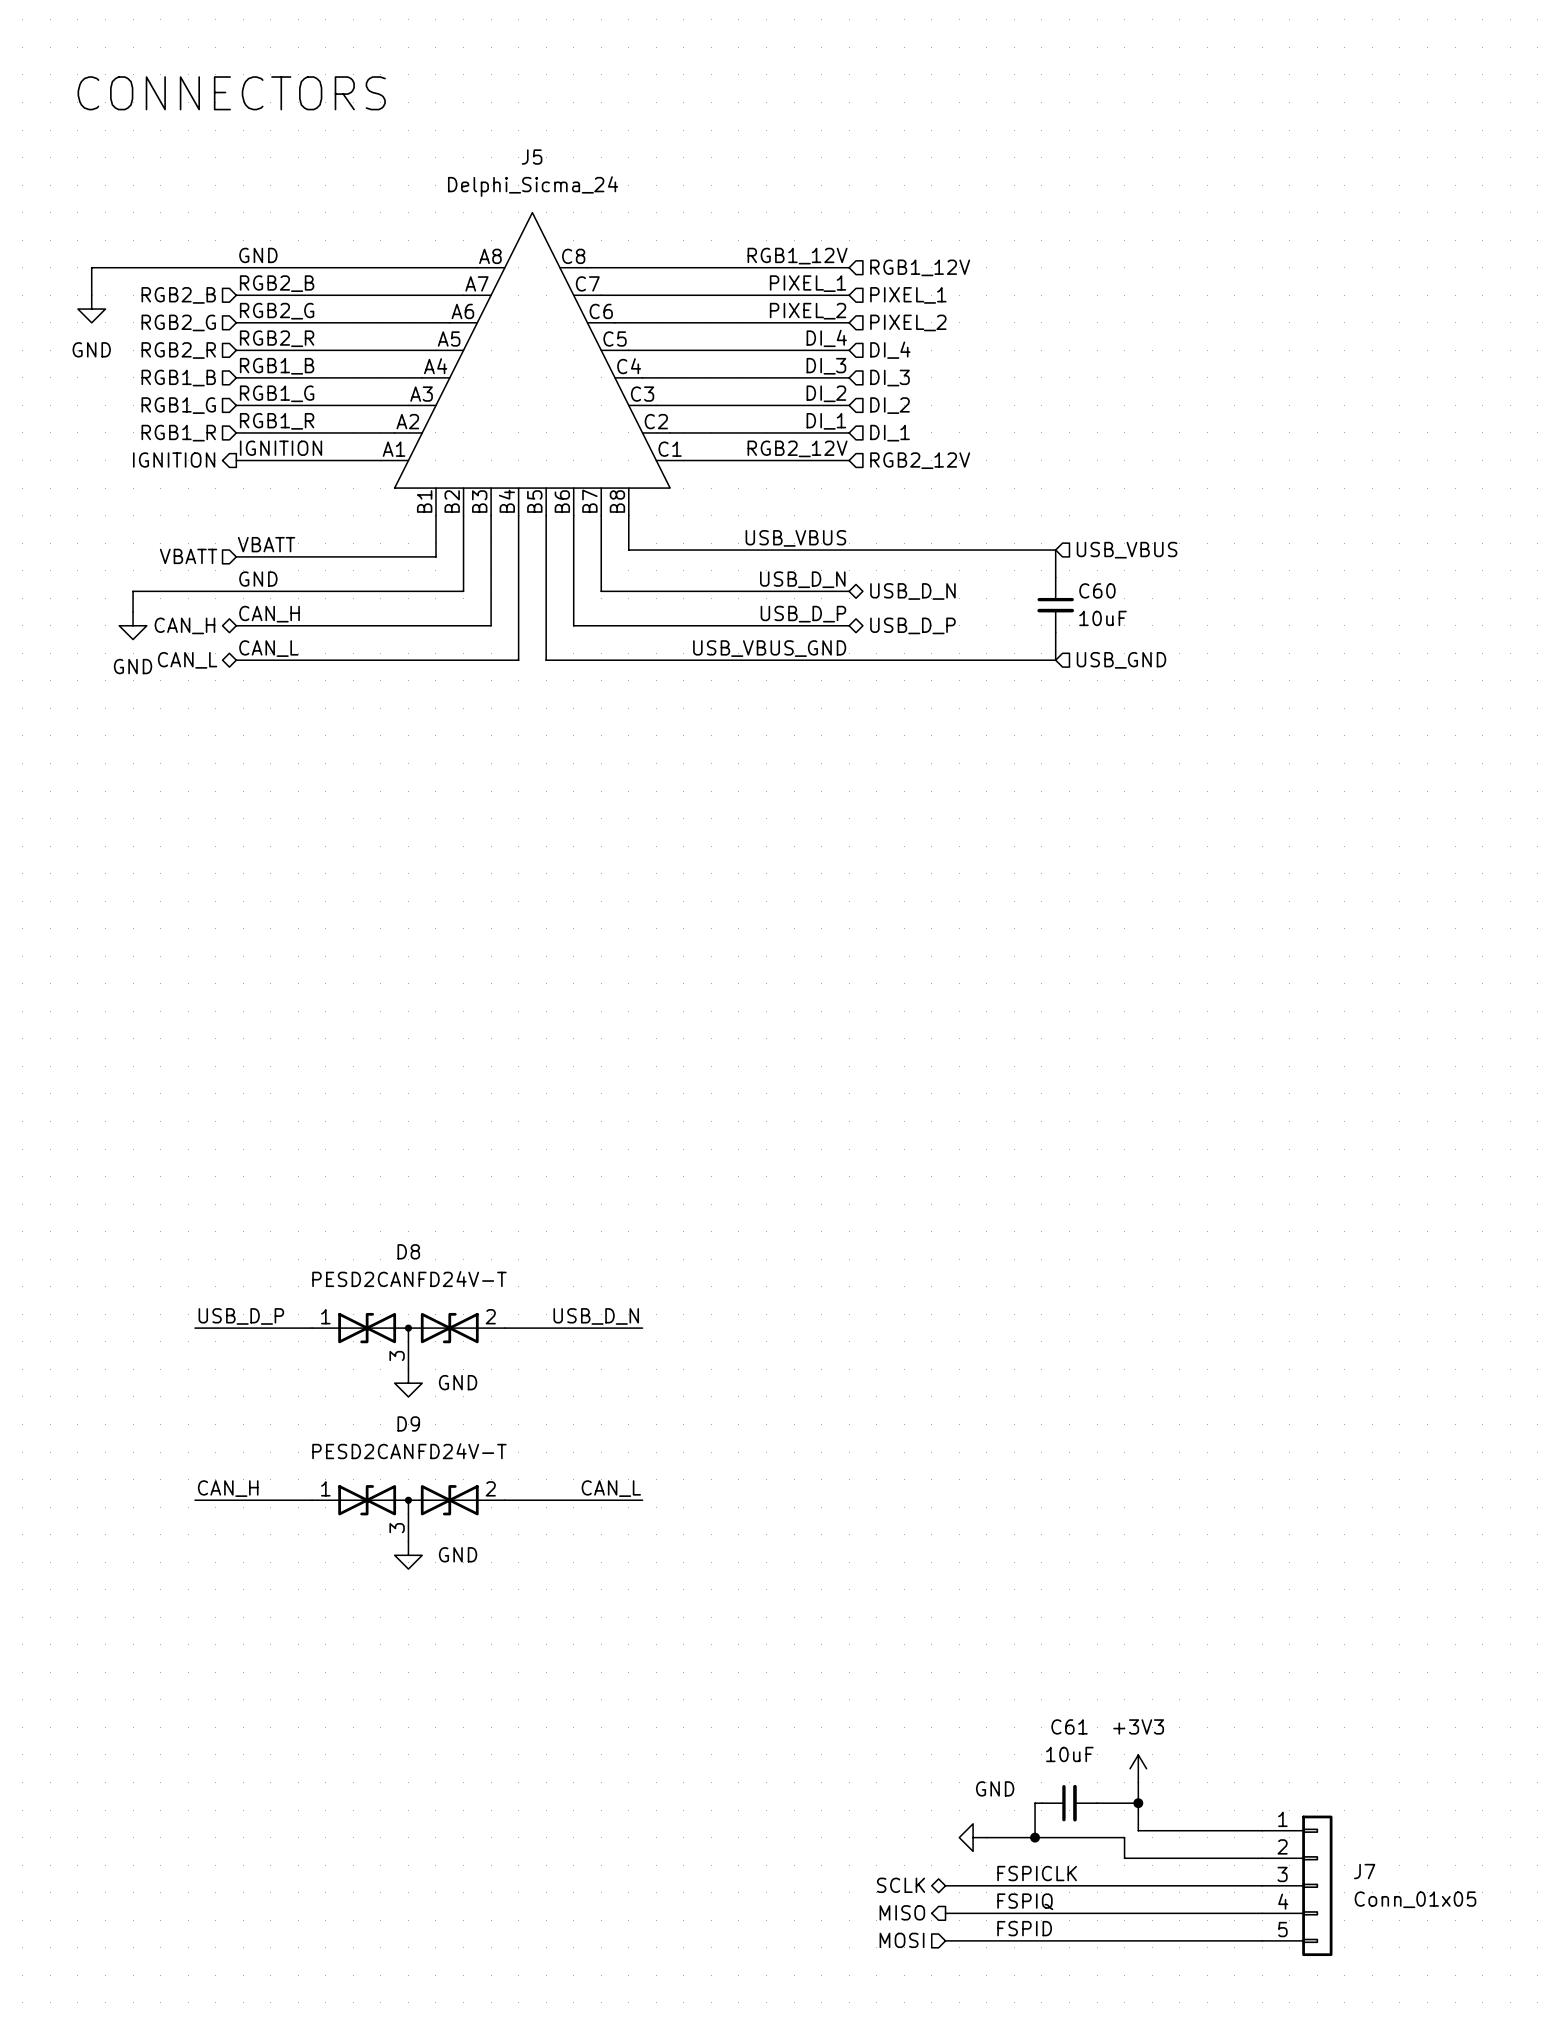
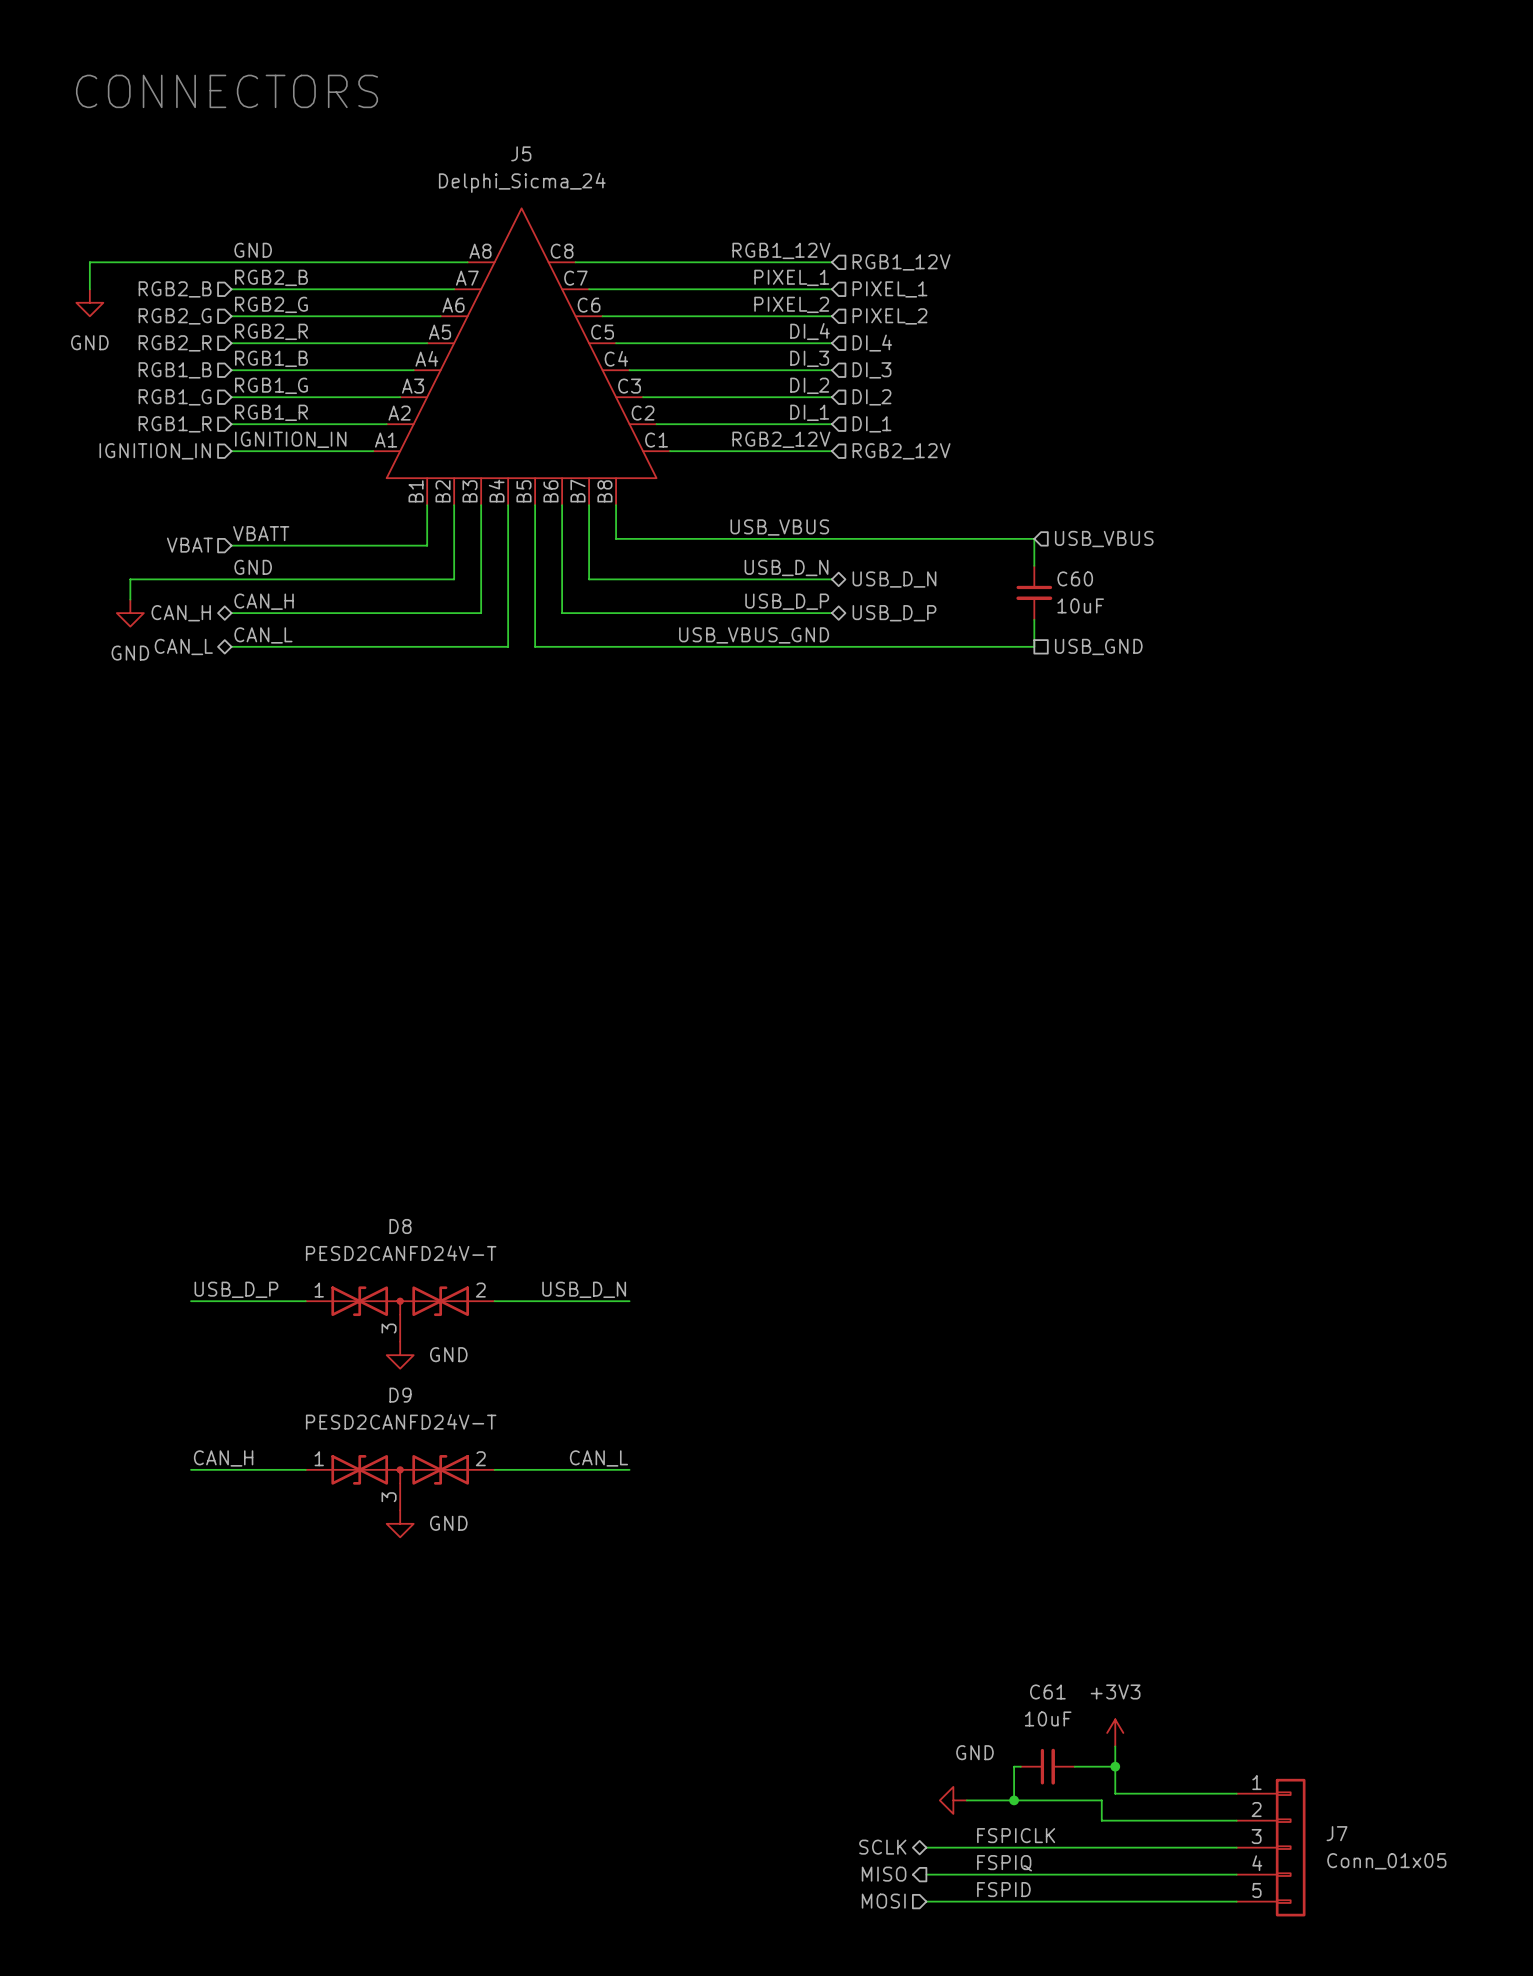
label: IGNITION (281, 448) -> IGNITION_IN (290, 439)
hierarchical label shape: output (174, 460) -> input (155, 451)
hierarchical label: IGNITION (174, 460) -> IGNITION_IN (155, 451)
hierarchical label: VBATT (188, 556) -> VBAT (189, 545)
hierarchical label shape: input (1121, 660) -> passive (1098, 646)

